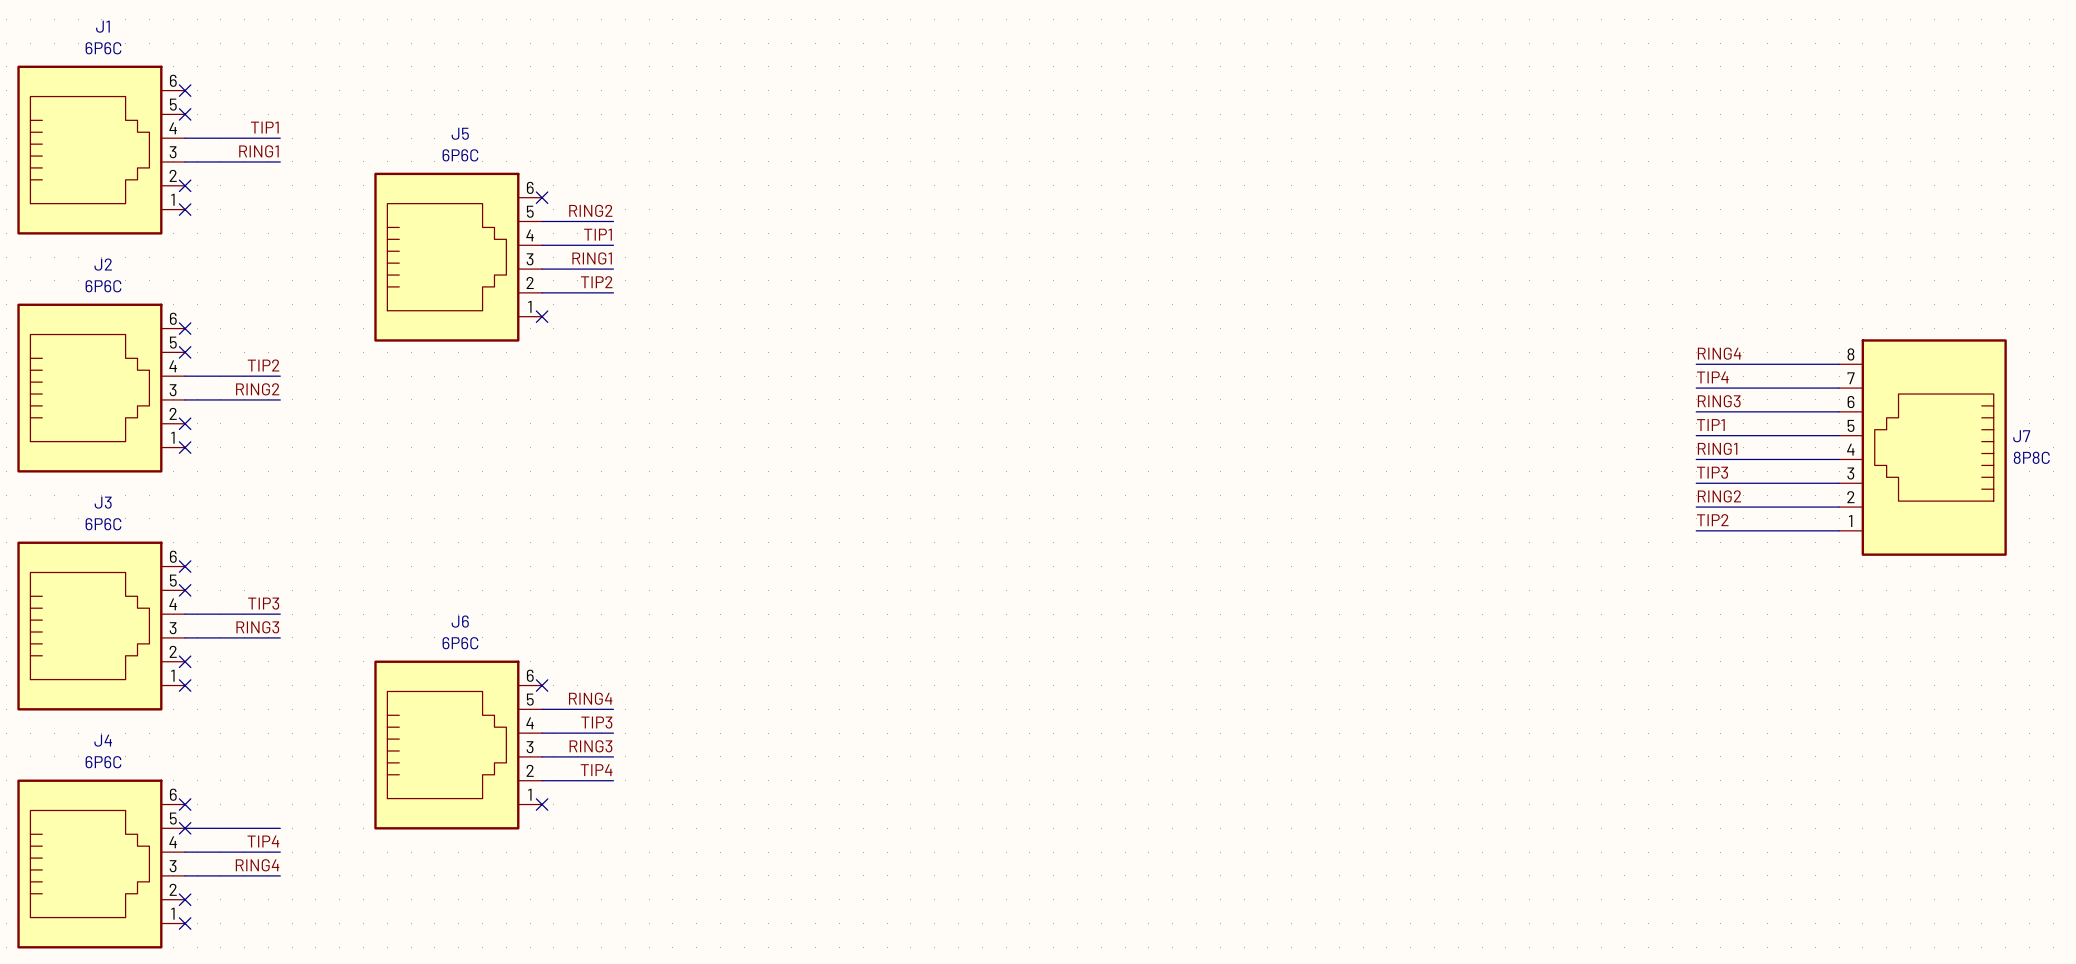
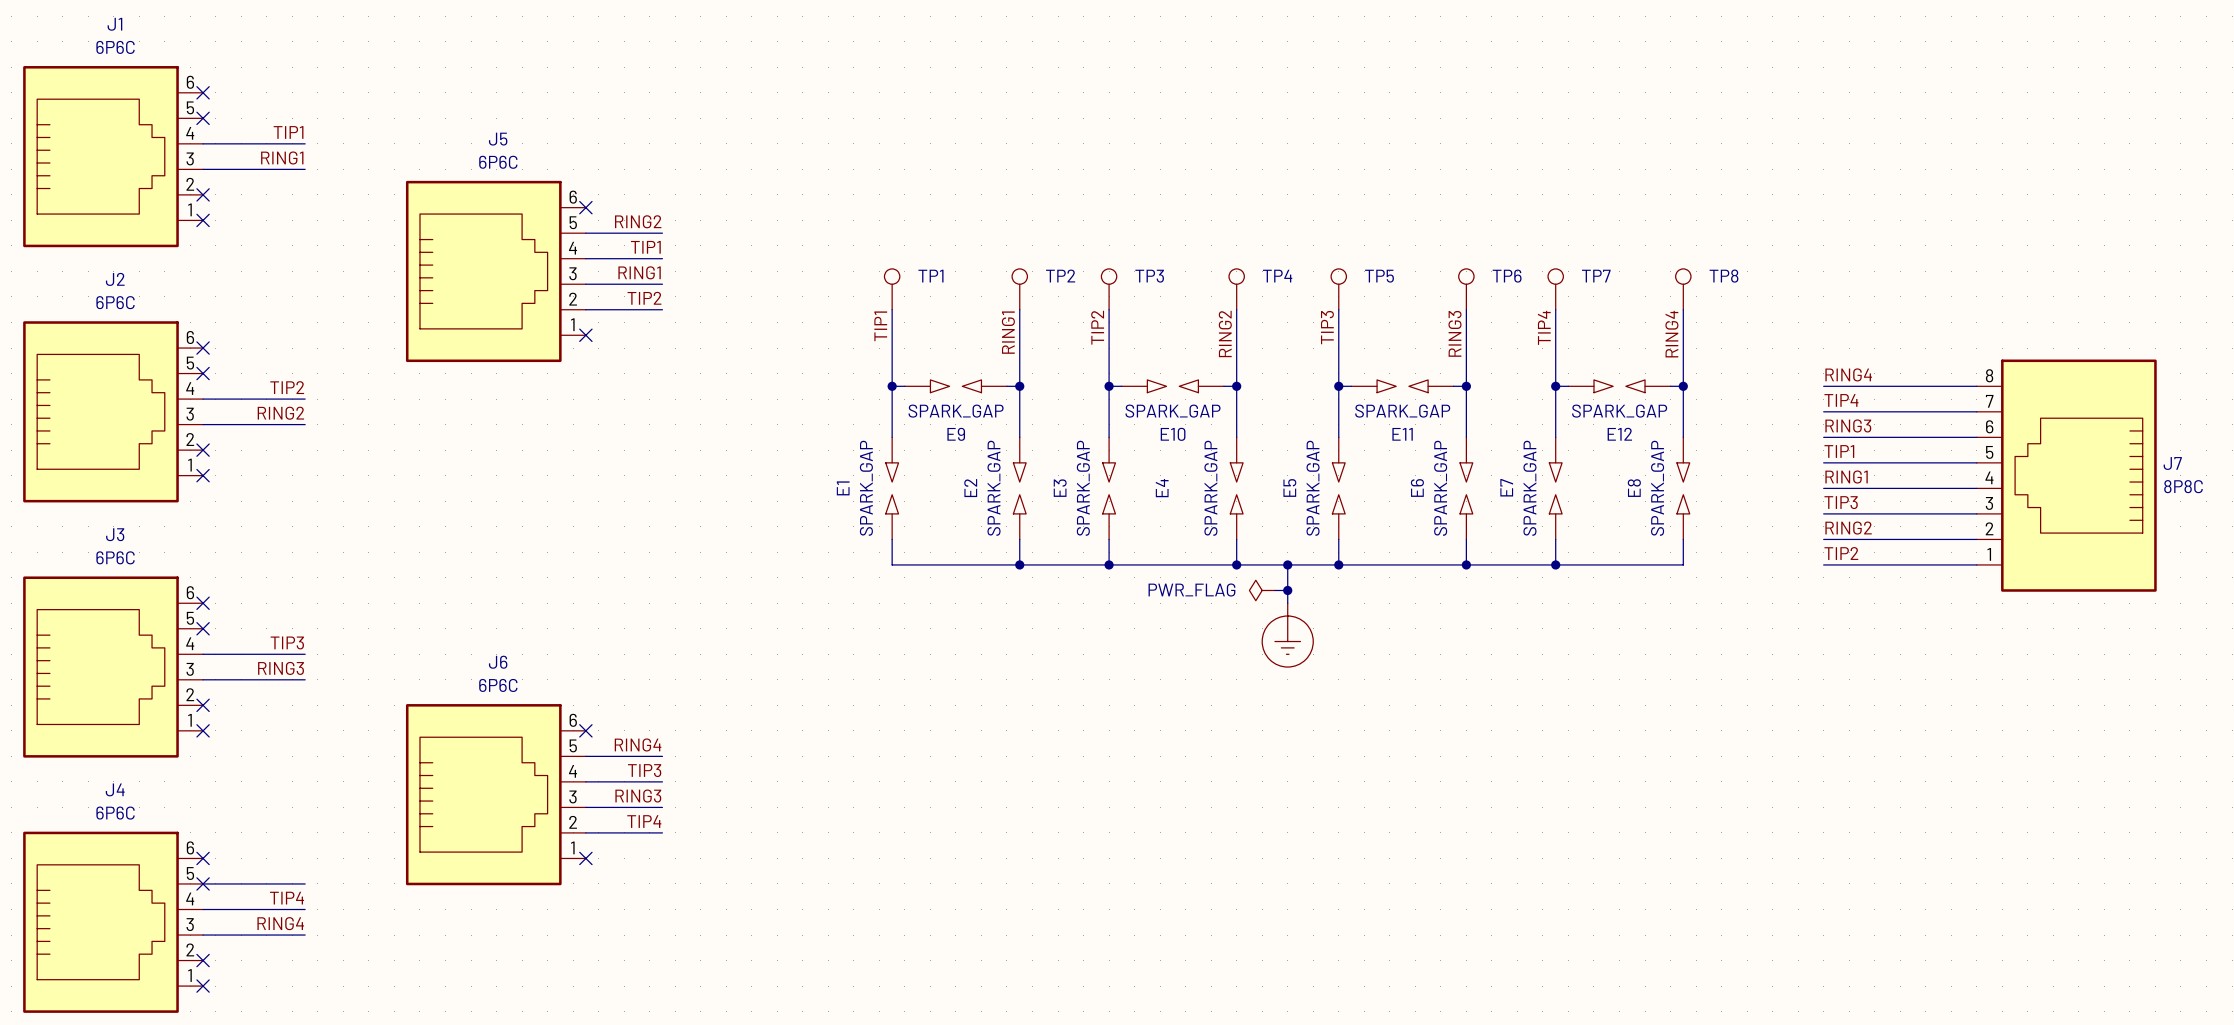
TP1: none -> (892, 289)
TP2: none -> (1019, 289)
TP3: none -> (1109, 289)
TP4: none -> (1236, 289)
TP5: none -> (1338, 289)
TP6: none -> (1466, 289)
TP7: none -> (1555, 289)
TP8: none -> (1683, 289)
wire: none -> (892, 309) (892, 437)
wire: none -> (1019, 309) (1019, 437)
wire: none -> (1109, 309) (1109, 437)
wire: none -> (1236, 309) (1236, 437)
wire: none -> (1338, 309) (1338, 437)
wire: none -> (1466, 309) (1466, 437)
wire: none -> (1555, 309) (1555, 437)
wire: none -> (1683, 309) (1683, 437)
label: none -> TIP1 (880, 326)
label: none -> TIP2 (1097, 327)
label: none -> TIP3 (1327, 327)
label: none -> TIP4 (1544, 327)
label: none -> RING1 (1008, 332)
label: none -> RING2 (1225, 333)
label: none -> RING3 (1454, 333)
label: none -> RING4 (1671, 334)
wire: none -> (892, 386) (904, 386)
junction: none -> (892, 386)
E9: none -> SPARK_GAP (955, 386)
wire: none -> (1006, 386) (1019, 386)
junction: none -> (1019, 386)
wire: none -> (1109, 386) (1121, 386)
junction: none -> (1109, 386)
E10: none -> SPARK_GAP (1172, 386)
wire: none -> (1223, 386) (1236, 386)
junction: none -> (1236, 386)
wire: none -> (1338, 386) (1351, 386)
junction: none -> (1338, 386)
E11: none -> SPARK_GAP (1402, 386)
wire: none -> (1453, 386) (1466, 386)
junction: none -> (1466, 386)
wire: none -> (1555, 386) (1568, 386)
junction: none -> (1555, 386)
E12: none -> SPARK_GAP (1619, 386)
wire: none -> (1670, 386) (1683, 386)
junction: none -> (1683, 386)
E1: none -> SPARK_GAP (892, 488)
E2: none -> SPARK_GAP (1019, 488)
E3: none -> SPARK_GAP (1109, 488)
E4: none -> SPARK_GAP (1236, 488)
E5: none -> SPARK_GAP (1338, 488)
E6: none -> SPARK_GAP (1466, 488)
E7: none -> SPARK_GAP (1555, 488)
E8: none -> SPARK_GAP (1683, 488)
wire: none -> (892, 539) (892, 564) (1683, 564) (1683, 539)
wire: none -> (1019, 539) (1019, 564)
wire: none -> (1109, 539) (1109, 564)
wire: none -> (1236, 539) (1236, 564)
wire: none -> (1338, 539) (1338, 564)
wire: none -> (1466, 539) (1466, 564)
wire: none -> (1555, 539) (1555, 564)
junction: none -> (1019, 564)
junction: none -> (1109, 564)
junction: none -> (1236, 564)
wire: none -> (1287, 564) (1287, 603)
junction: none -> (1287, 564)
junction: none -> (1338, 564)
junction: none -> (1466, 564)
junction: none -> (1555, 564)
power symbol: none -> PWR_FLAG (1262, 590)
wire: none -> (1274, 590) (1287, 590)
junction: none -> (1287, 590)
power symbol: none -> (1287, 635)

